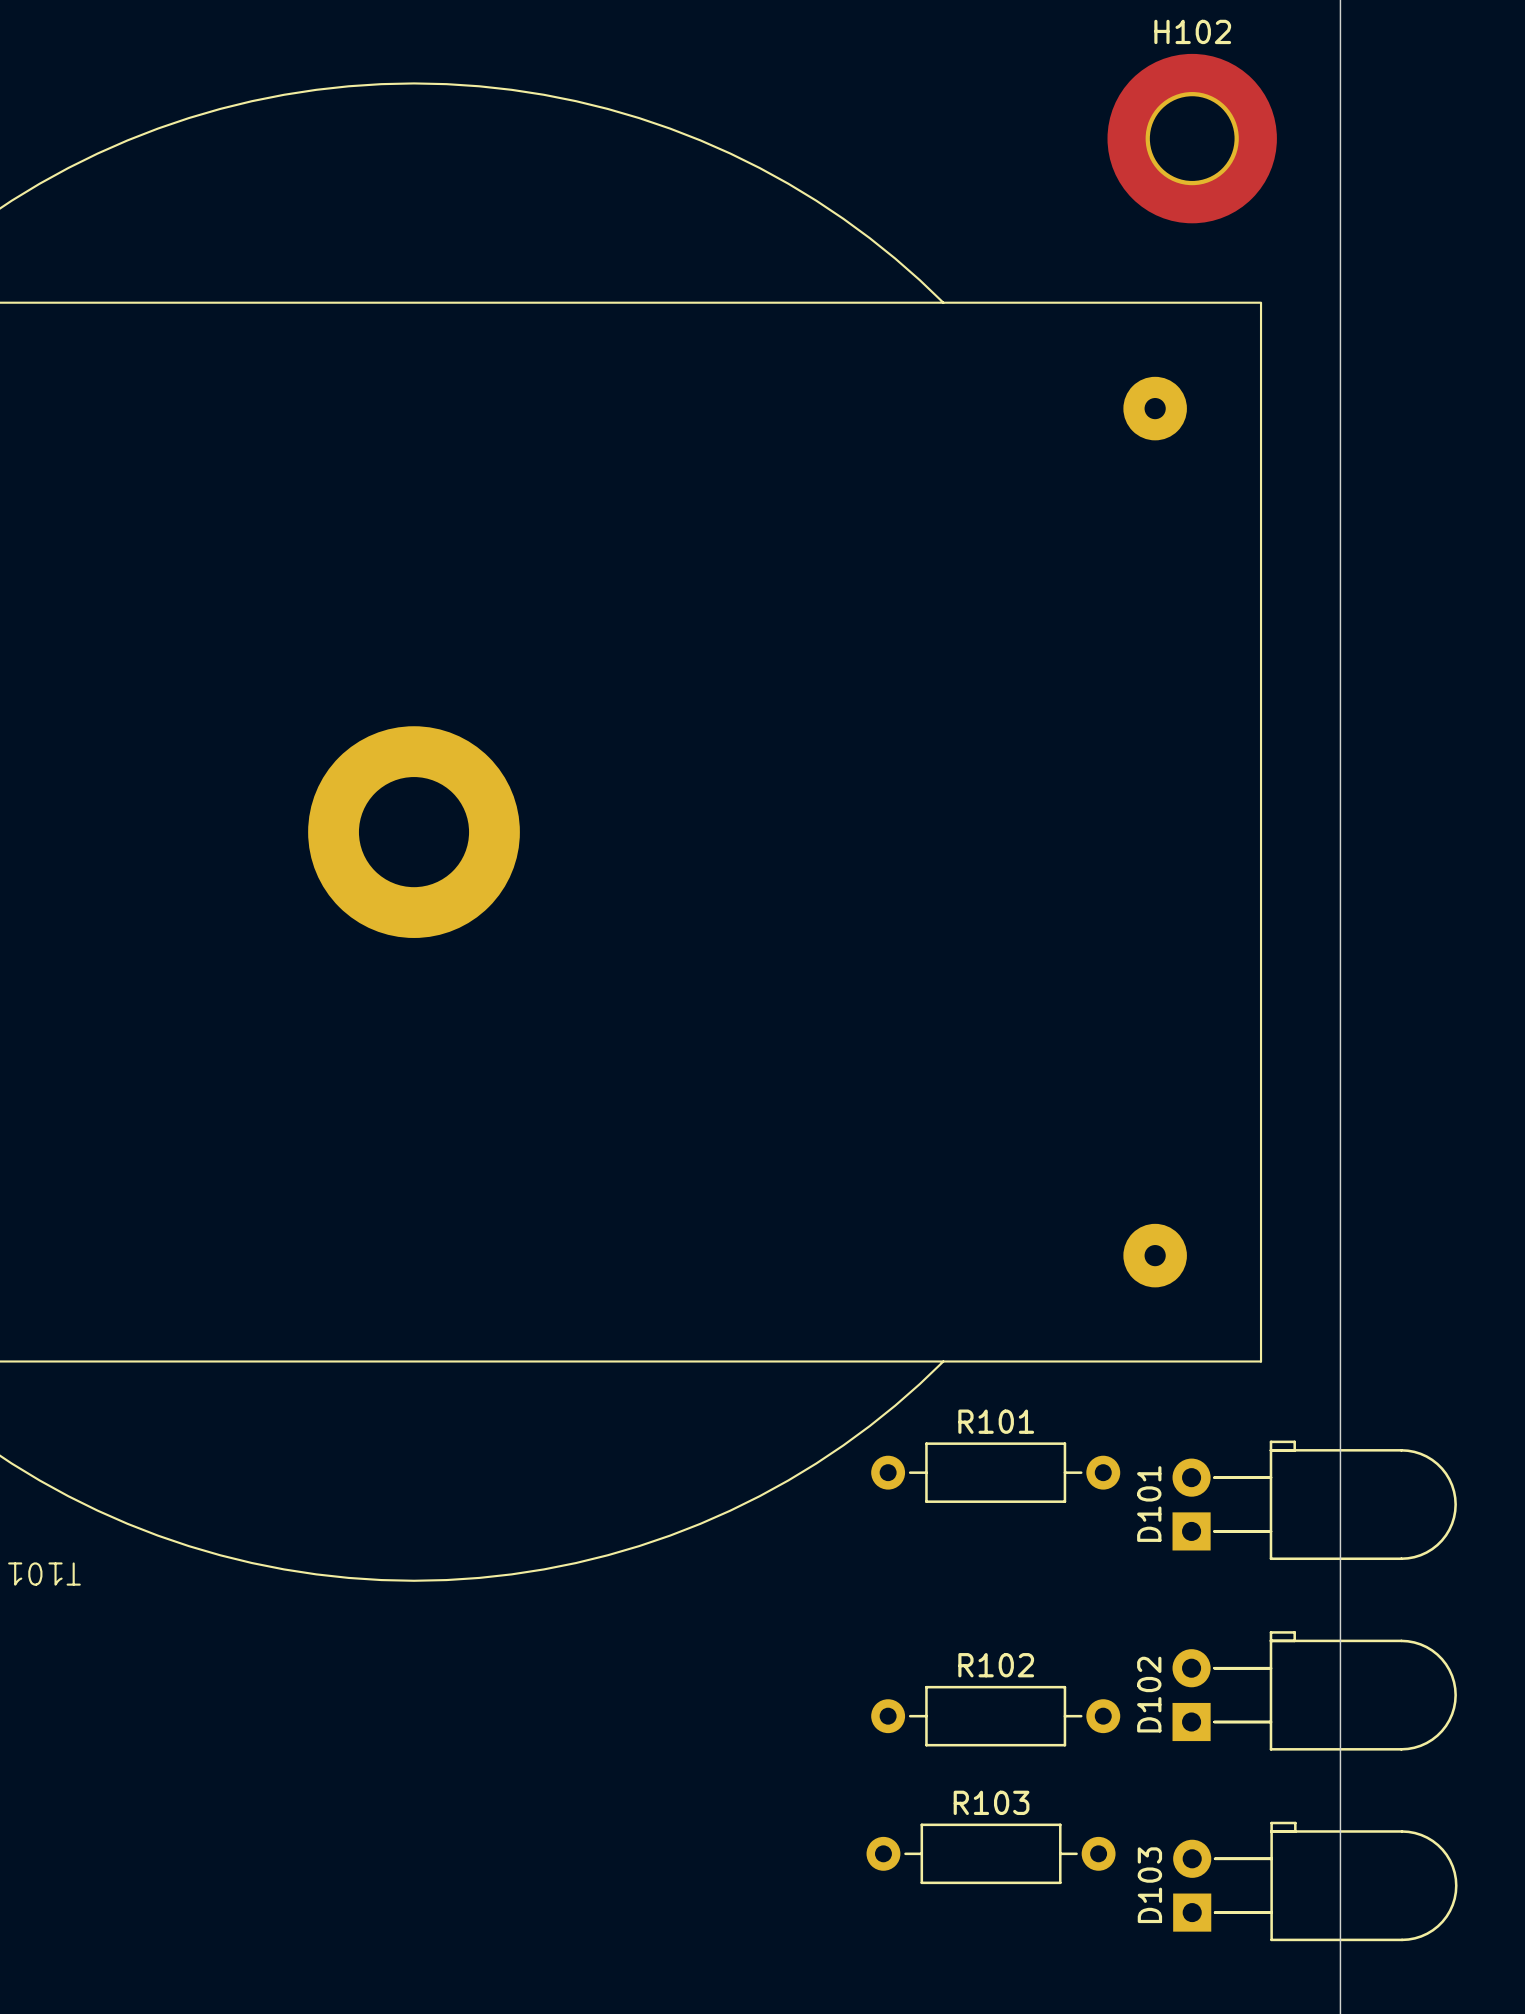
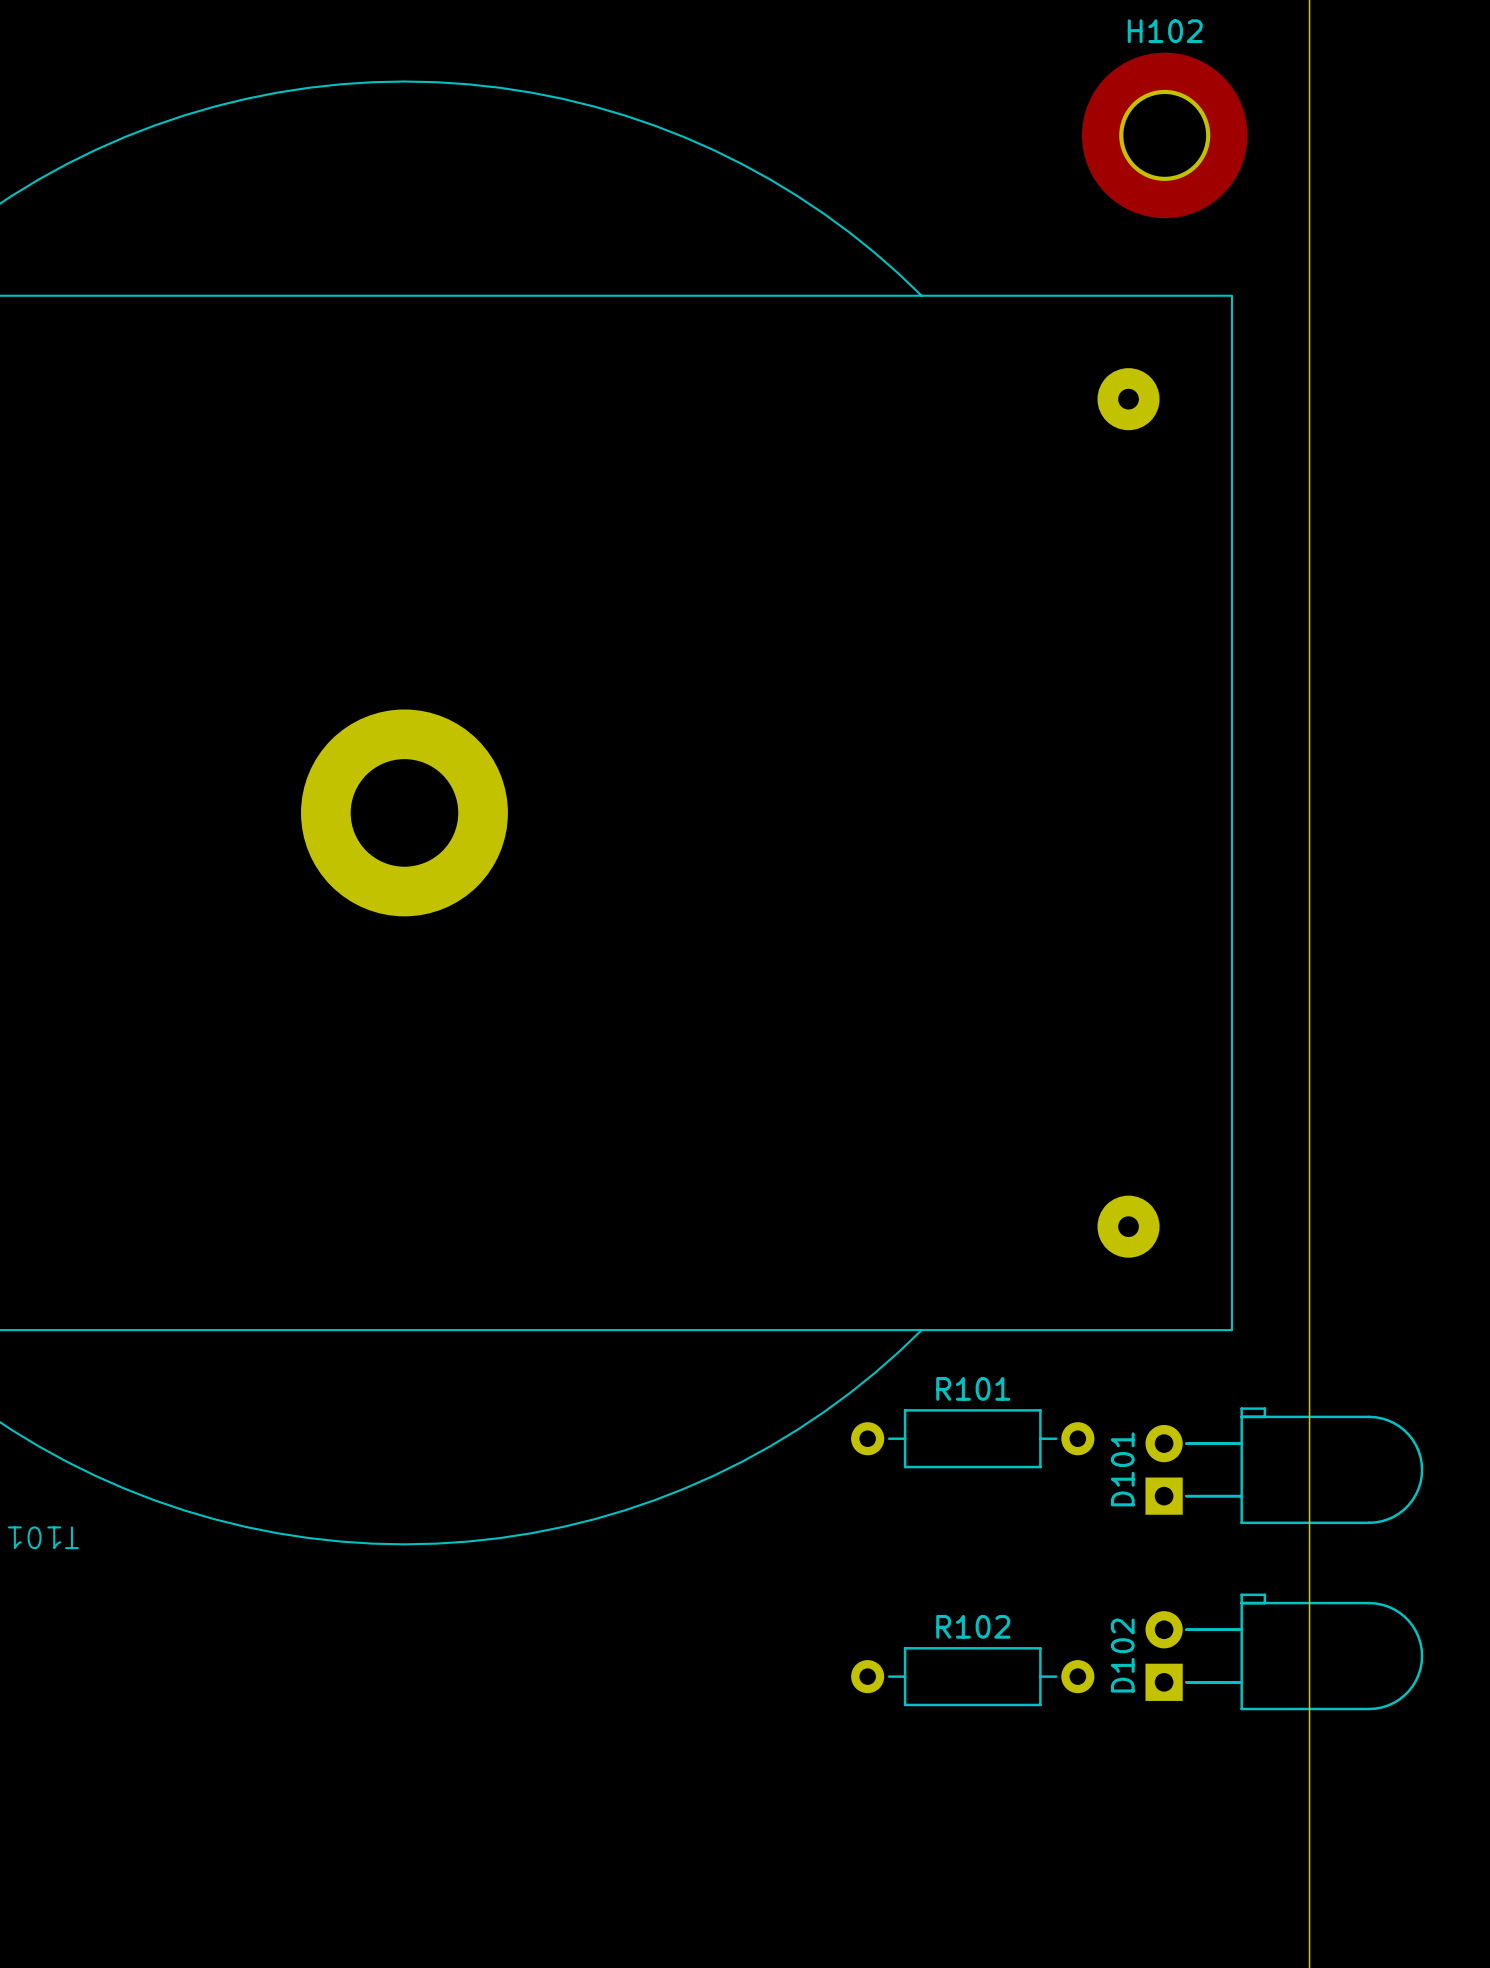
R103: (991, 1853) -> none
D103: (1315, 1881) -> none

